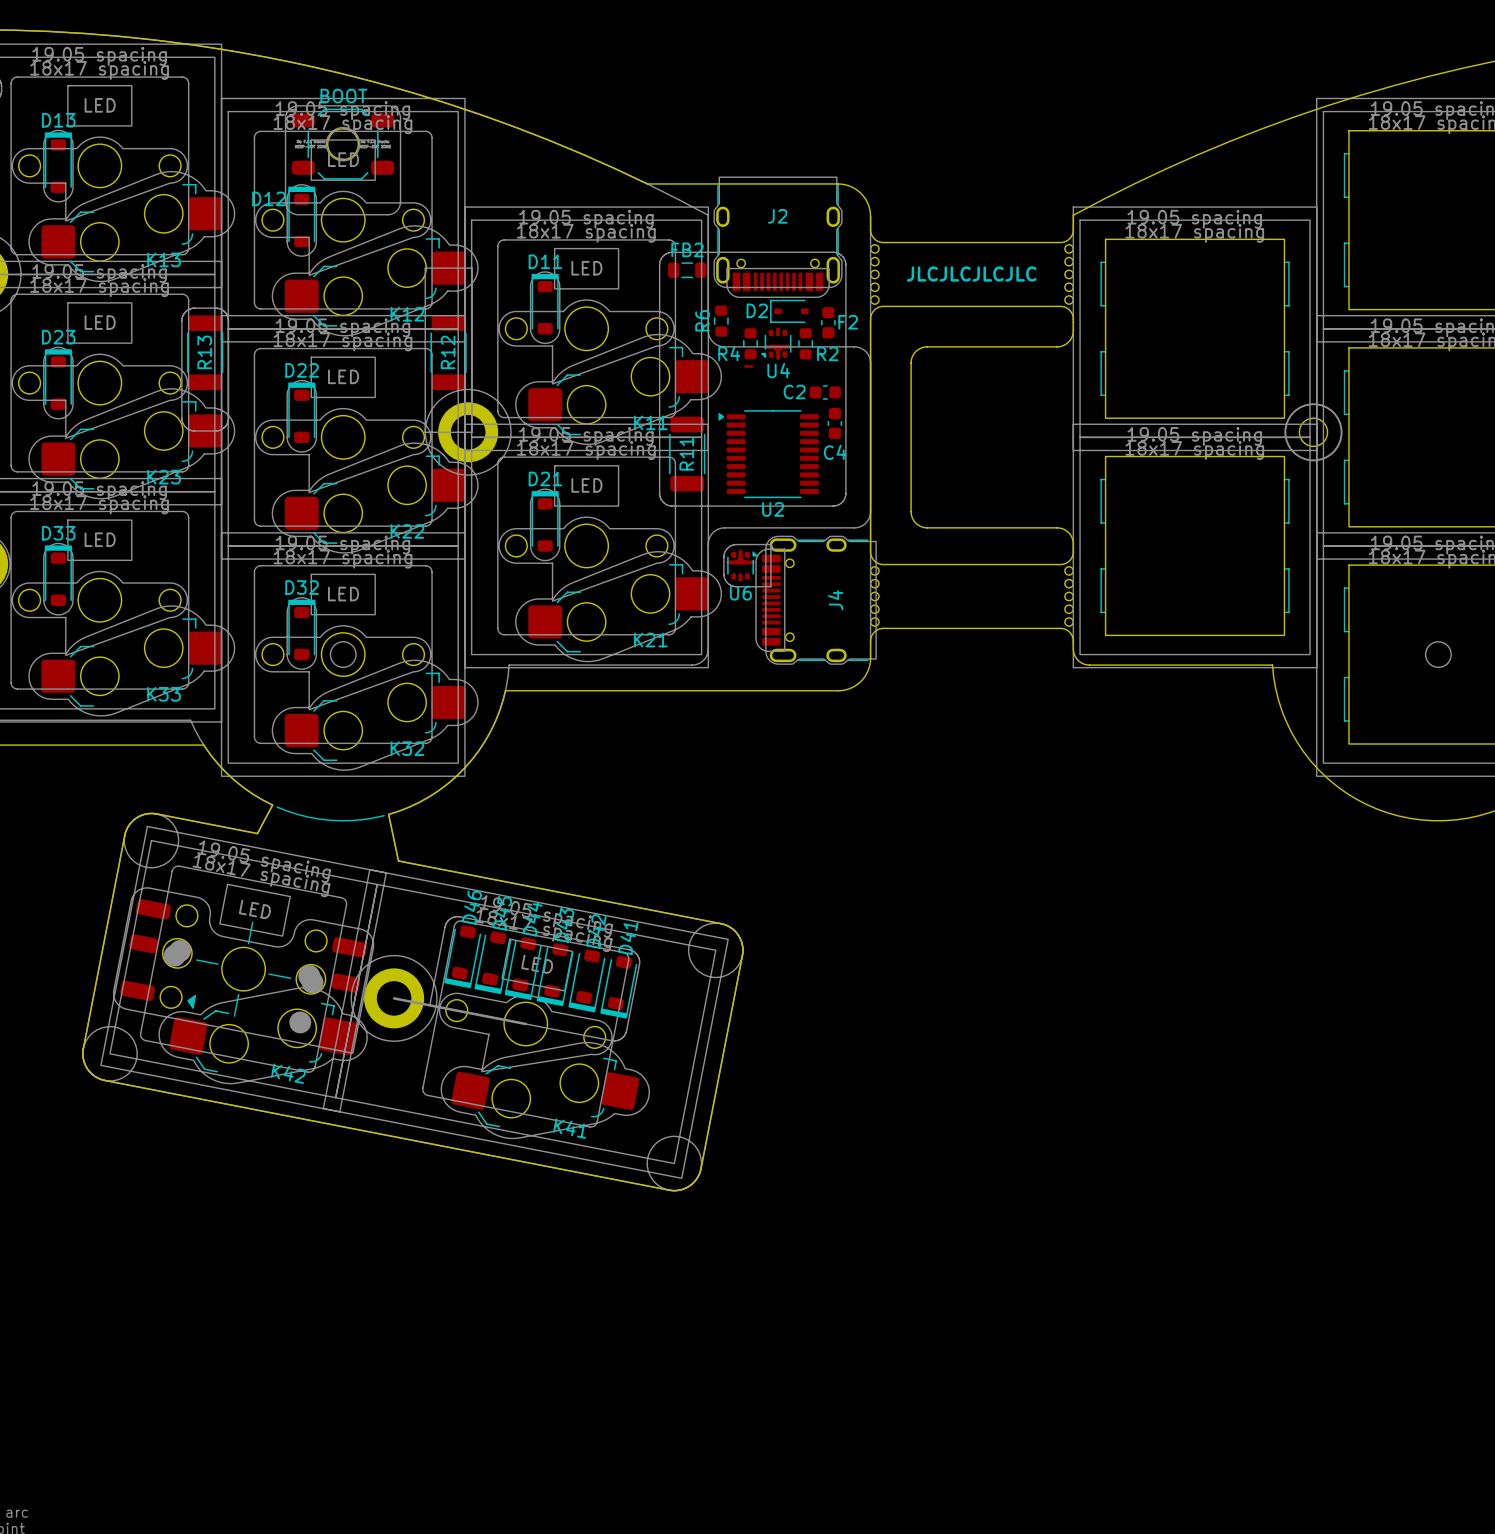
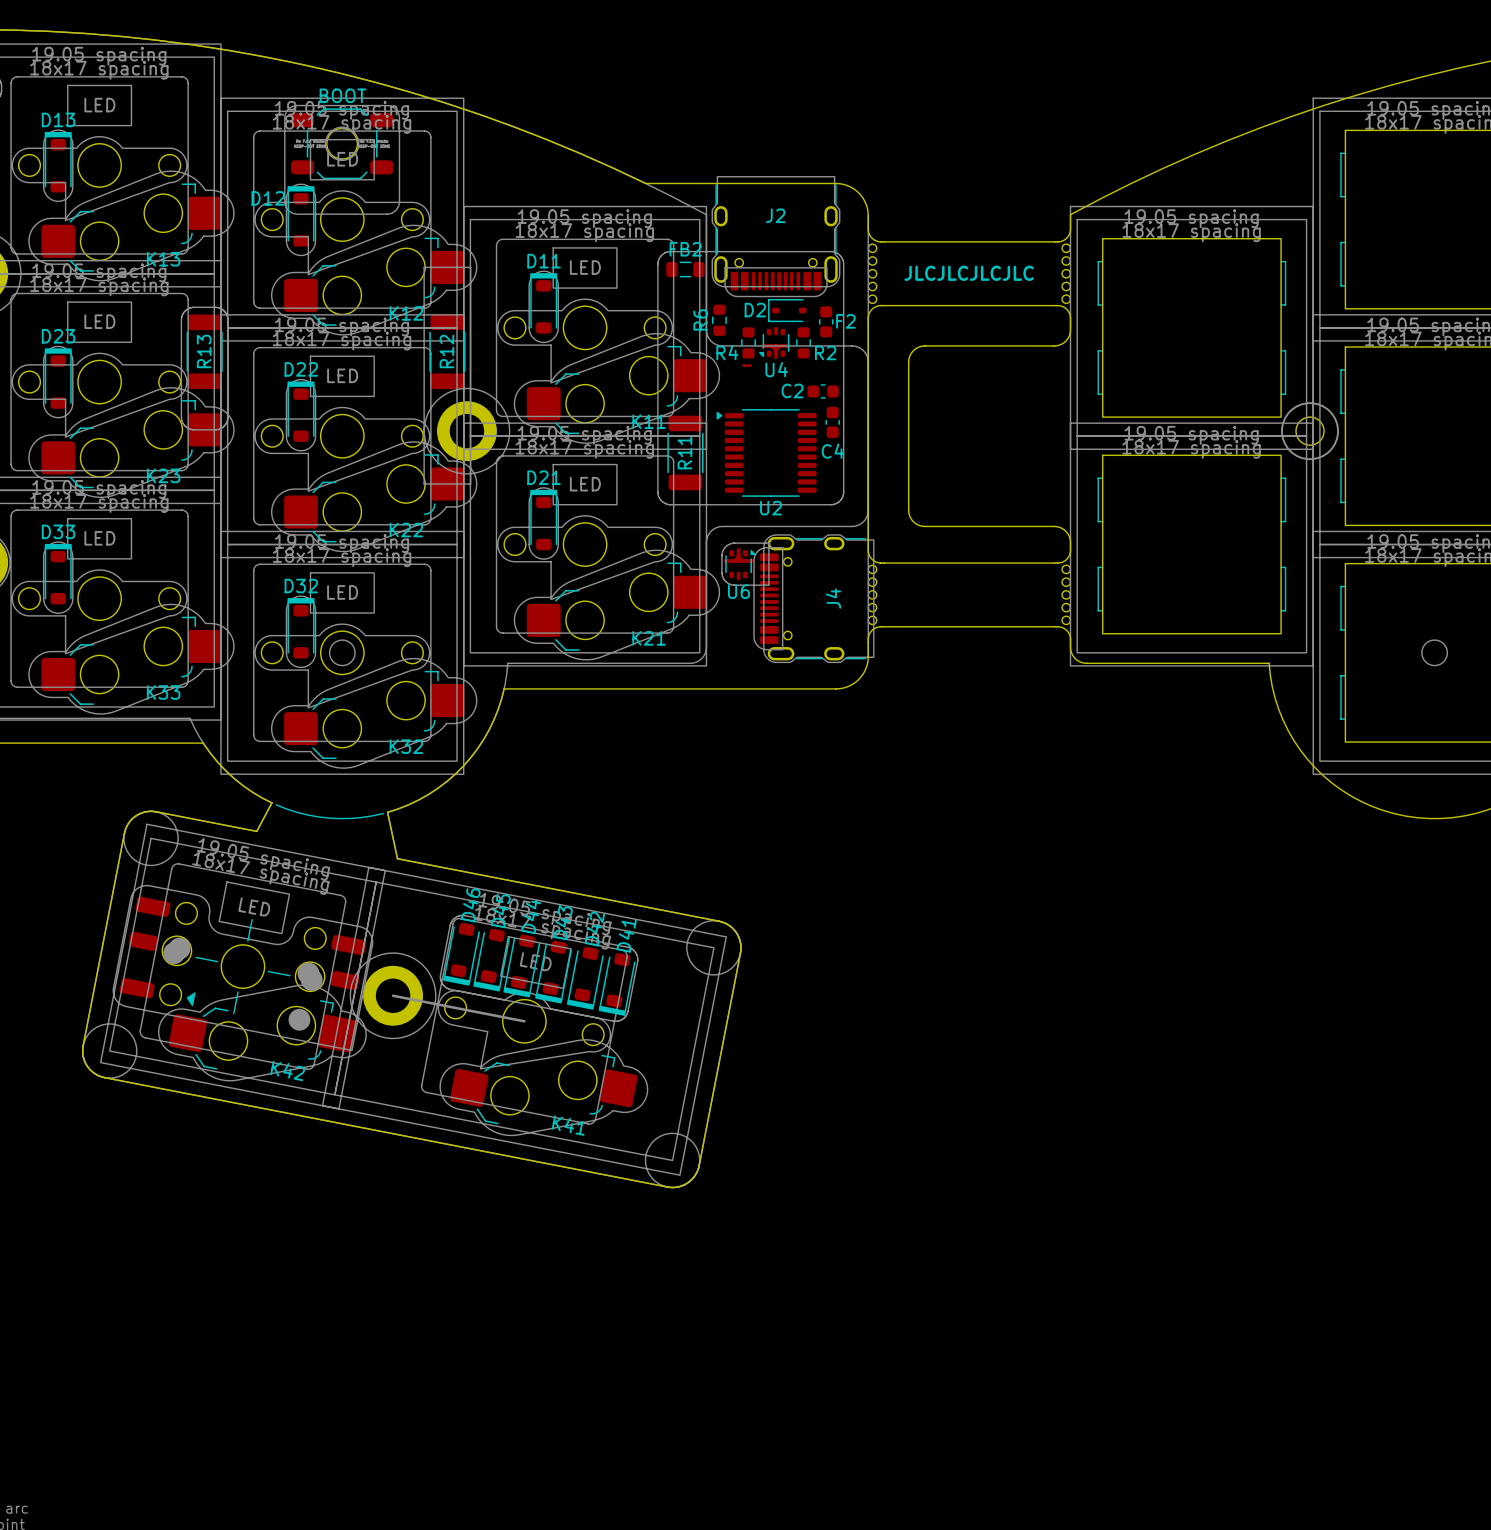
line: (425, 432) (471, 432) -> (424, 431) (424, 483) (470, 483) (470, 431)
line: (466, 918) (453, 917) (446, 923) (429, 1005) (617, 1040) (623, 1036) (626, 1030) (639, 963) (635, 952) -> (465, 915) (456, 916) (450, 922) (440, 974) (442, 984) (450, 989) (618, 1020) (624, 1017) (628, 1011) (637, 960) (633, 950)

